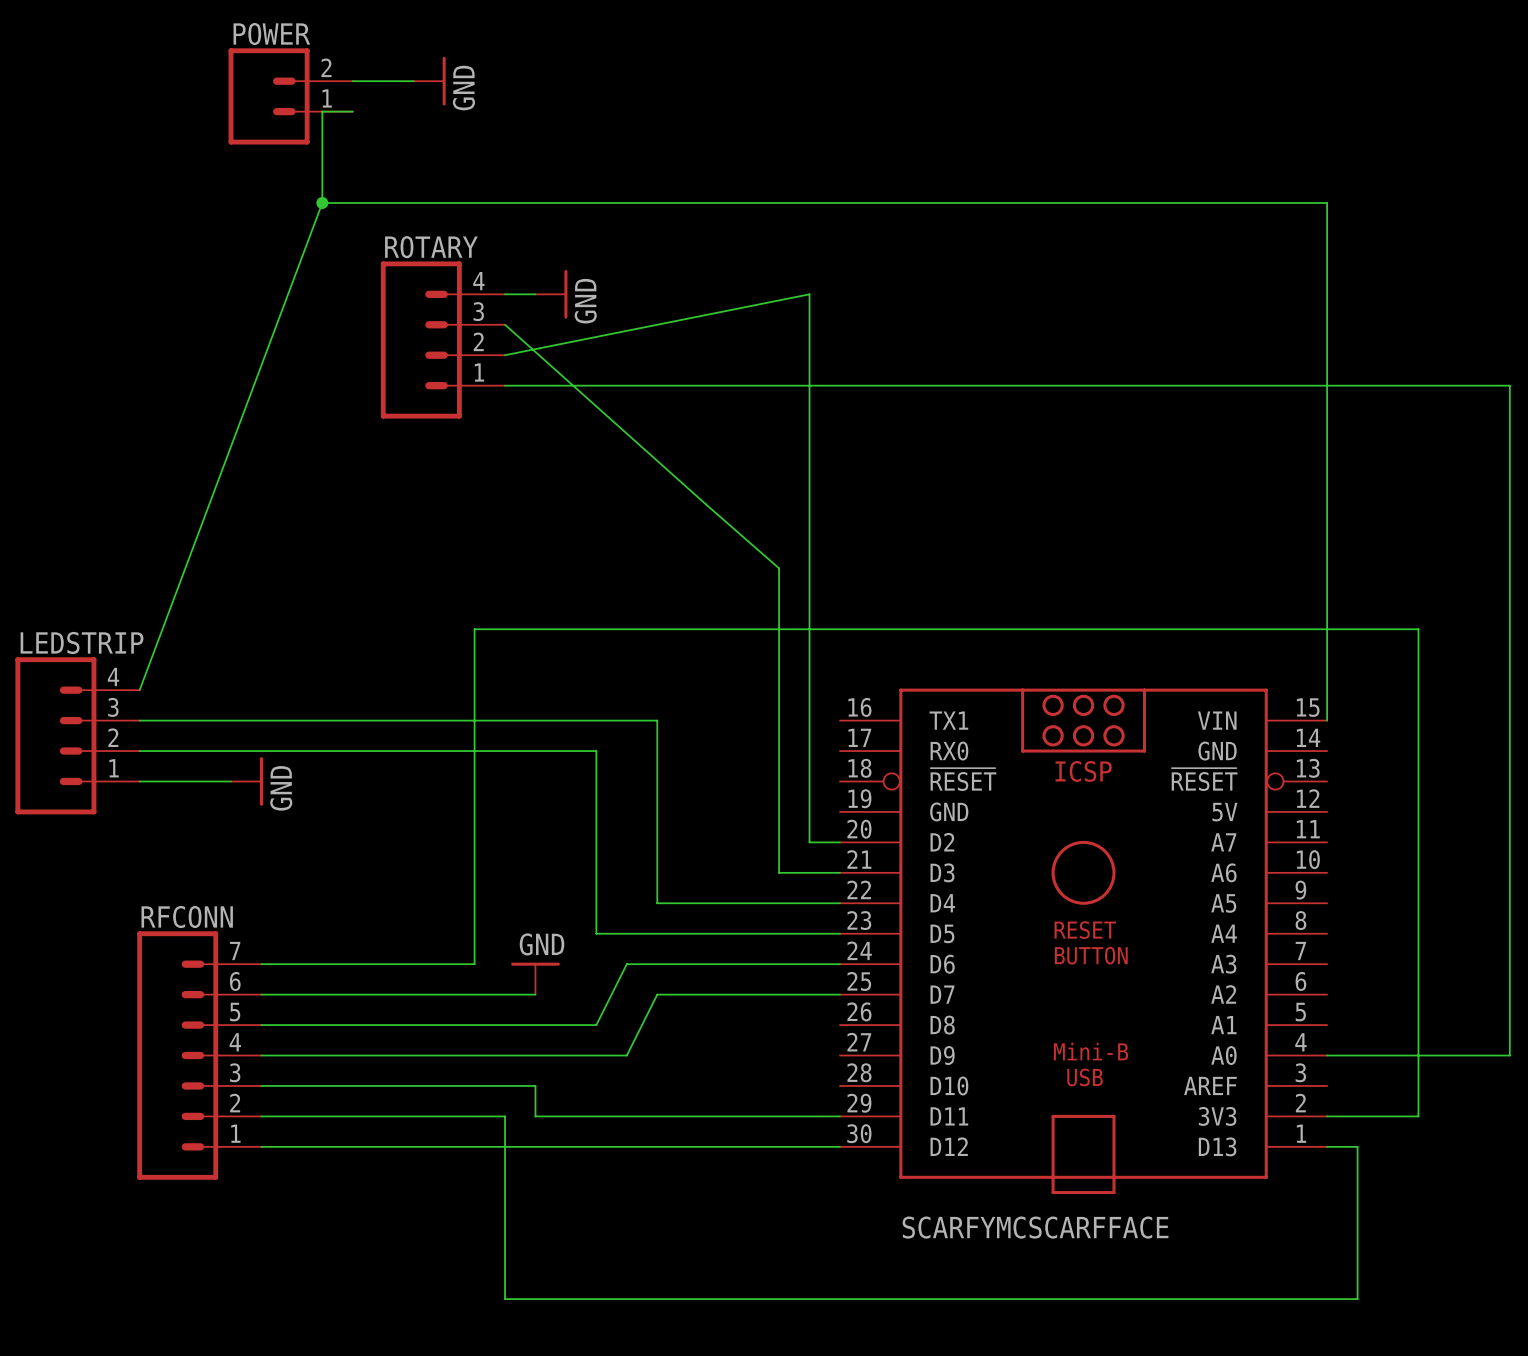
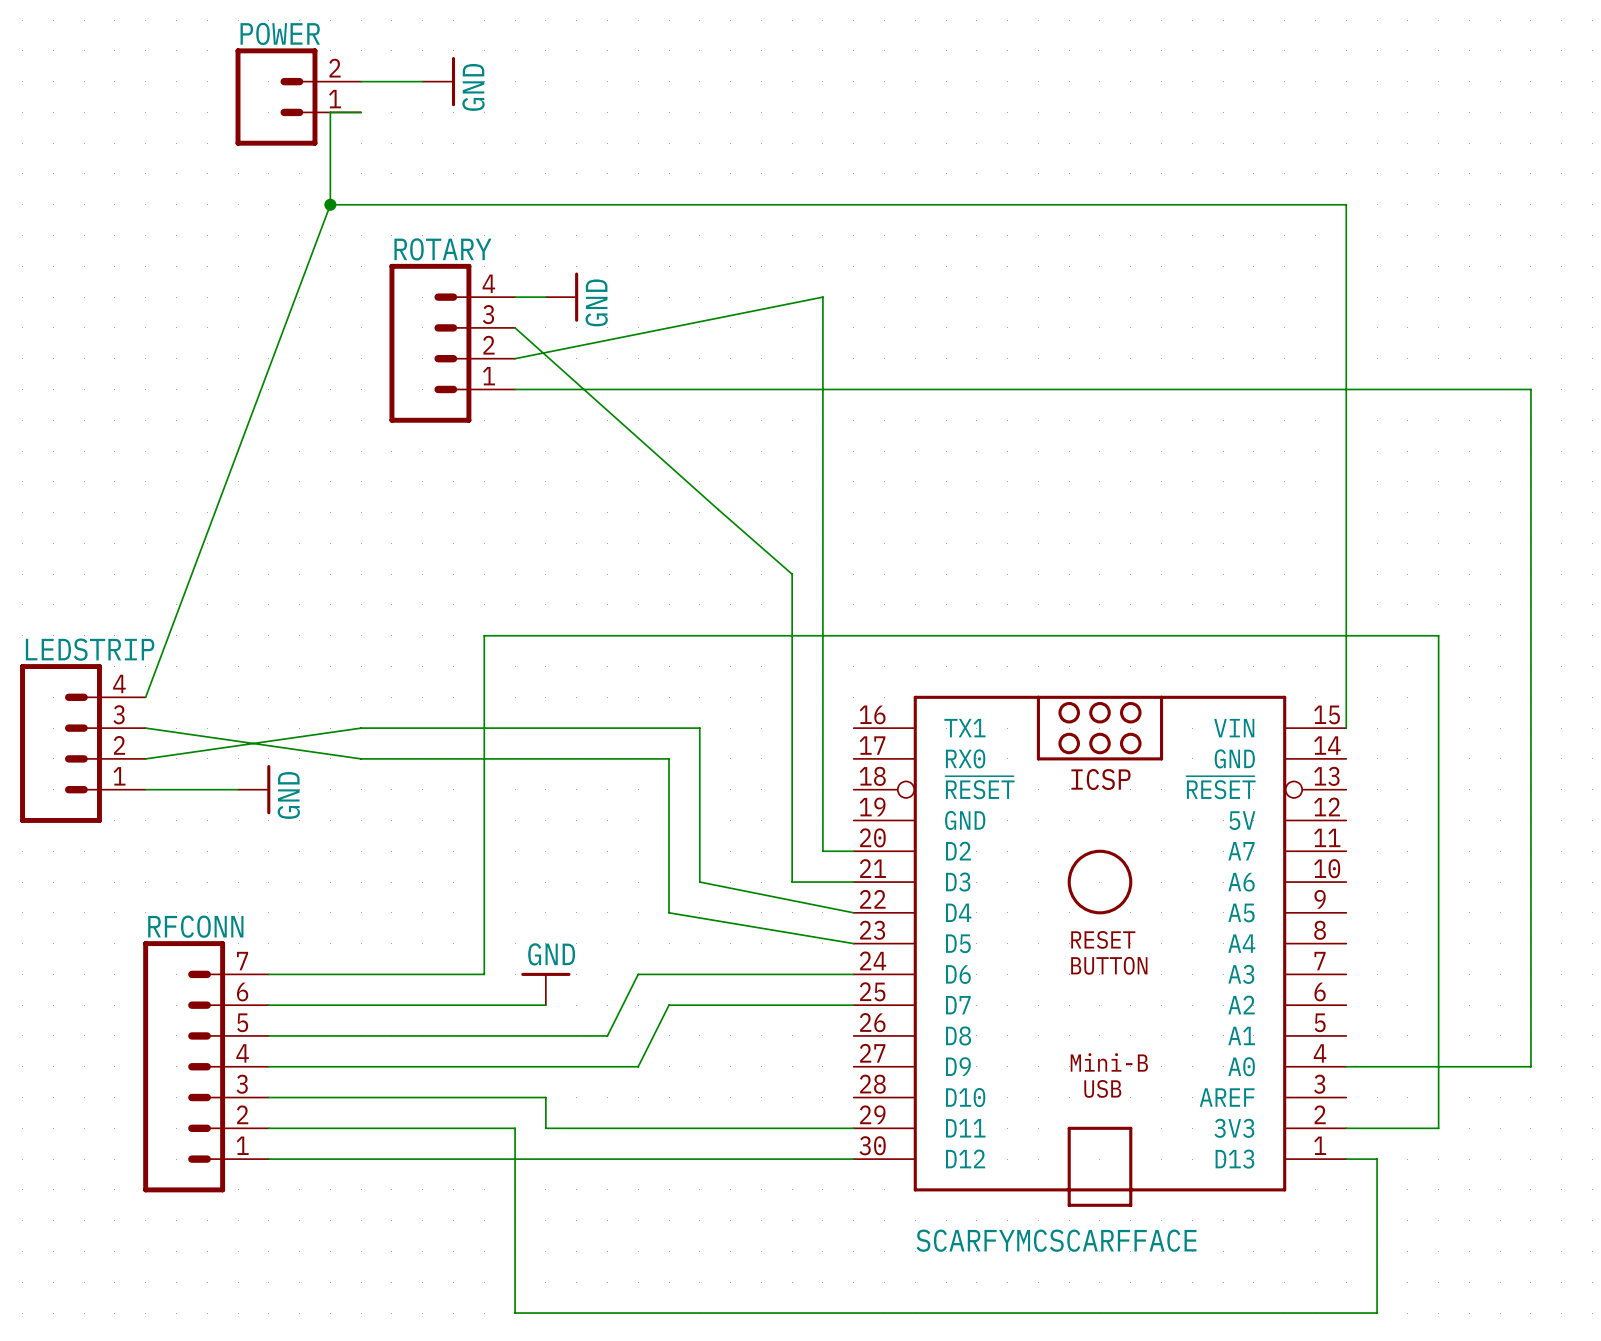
wire: (139, 720) (352, 720) -> (145, 728) (361, 758)
wire: (657, 720) (657, 751) -> (607, 758) (669, 758)
wire: none -> (669, 728) (699, 728) (699, 882) (853, 912)
wire: (139, 751) (352, 751) -> (145, 758) (361, 728)
wire: (596, 751) (596, 933) (839, 933) -> none
wire: (657, 903) (839, 903) -> (669, 912) (853, 943)

